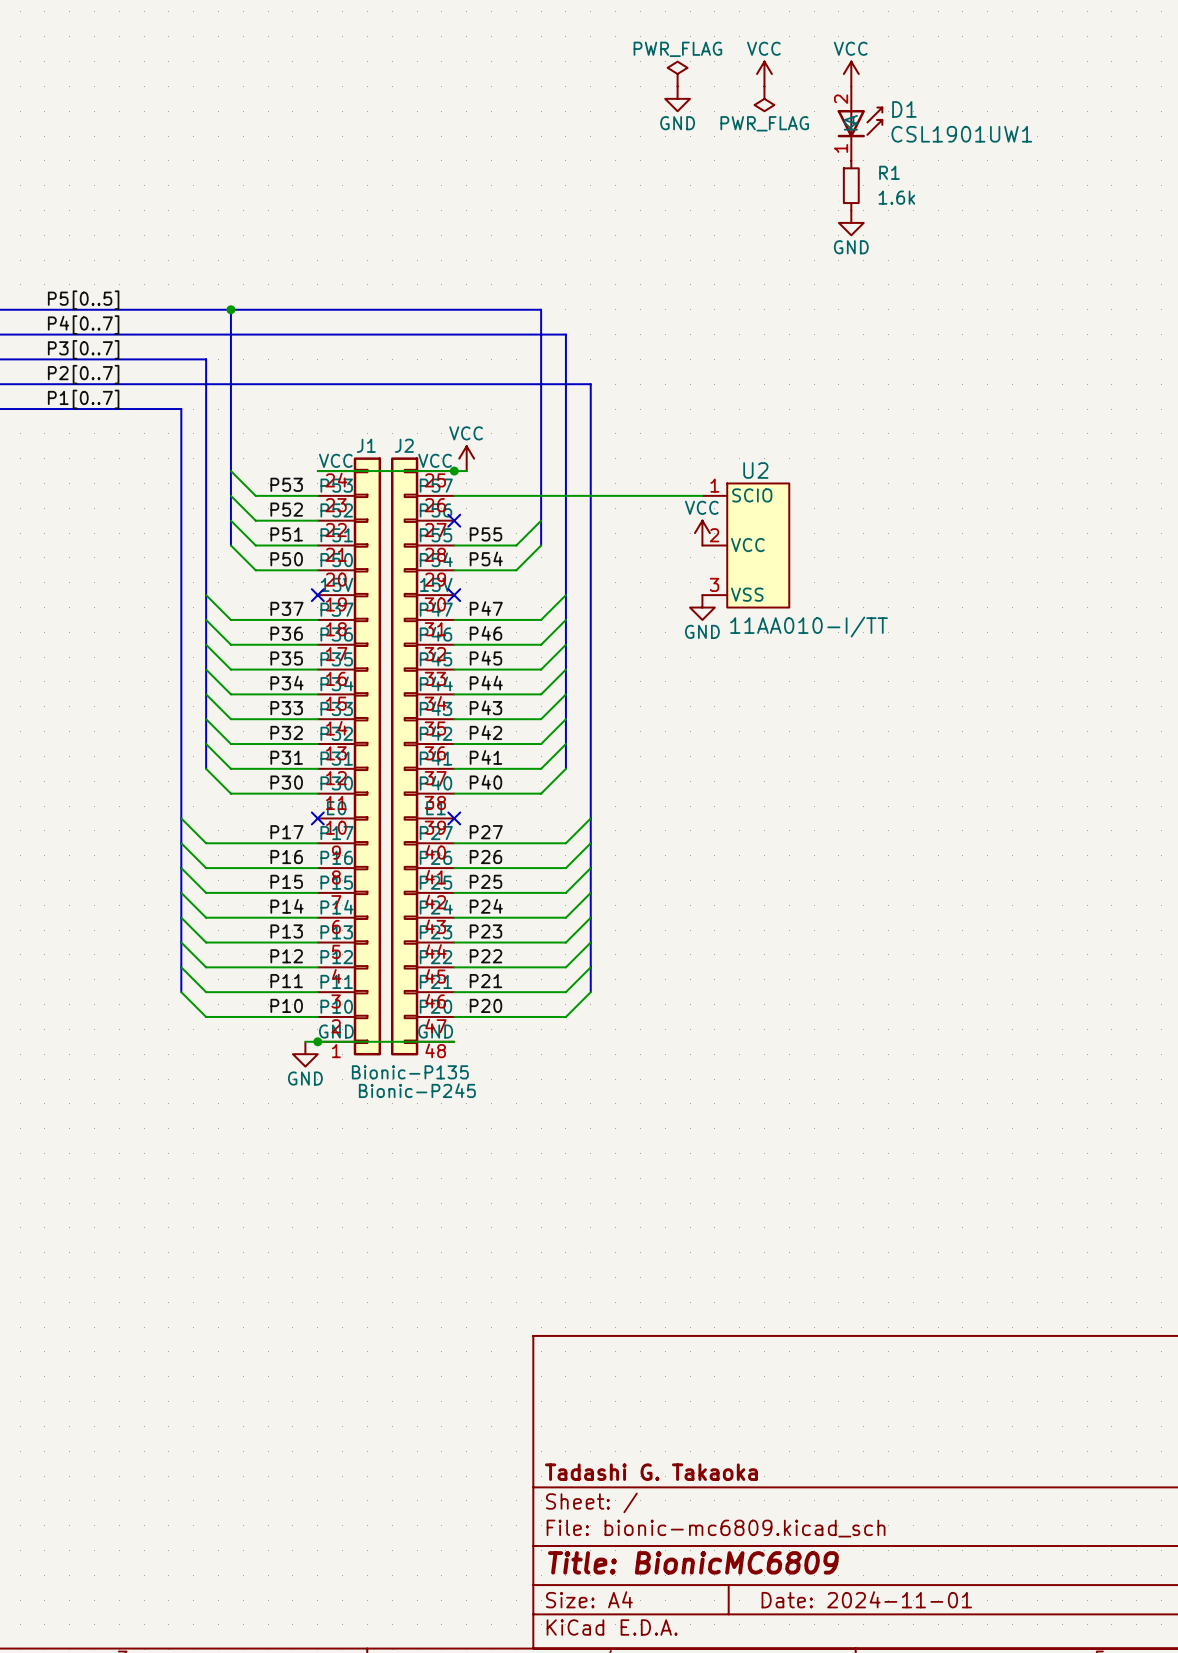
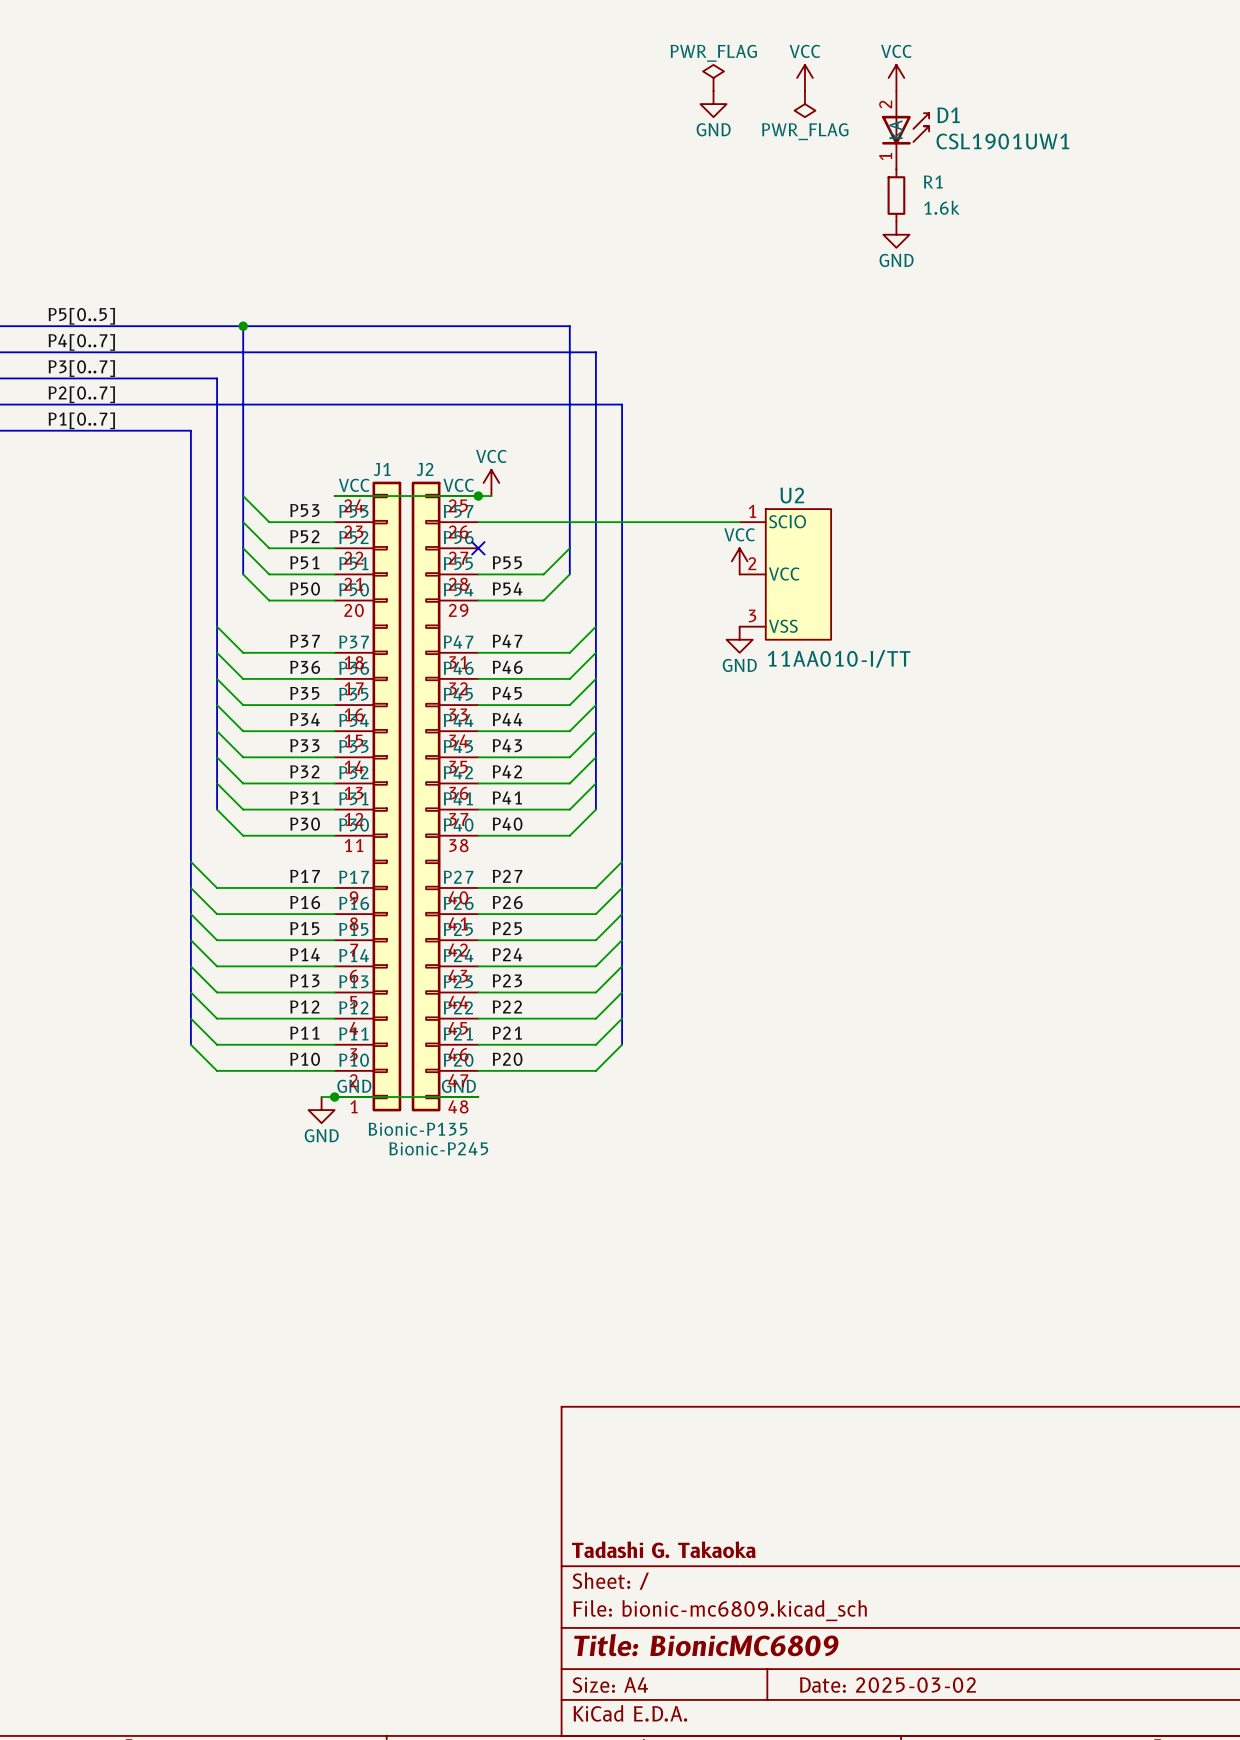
J1 symbol: [317, 457, 382, 1056] -> [334, 481, 402, 1112]
J2 symbol: [390, 457, 455, 1056] -> [411, 481, 479, 1112]
no-connect mark: (317, 595) -> none
no-connect mark: (454, 595) -> none
no-connect mark: (317, 818) -> none
no-connect mark: (454, 818) -> none
title block: Date: 2024-11-01 (866, 1599) -> Date: 2025-03-02 (887, 1685)

